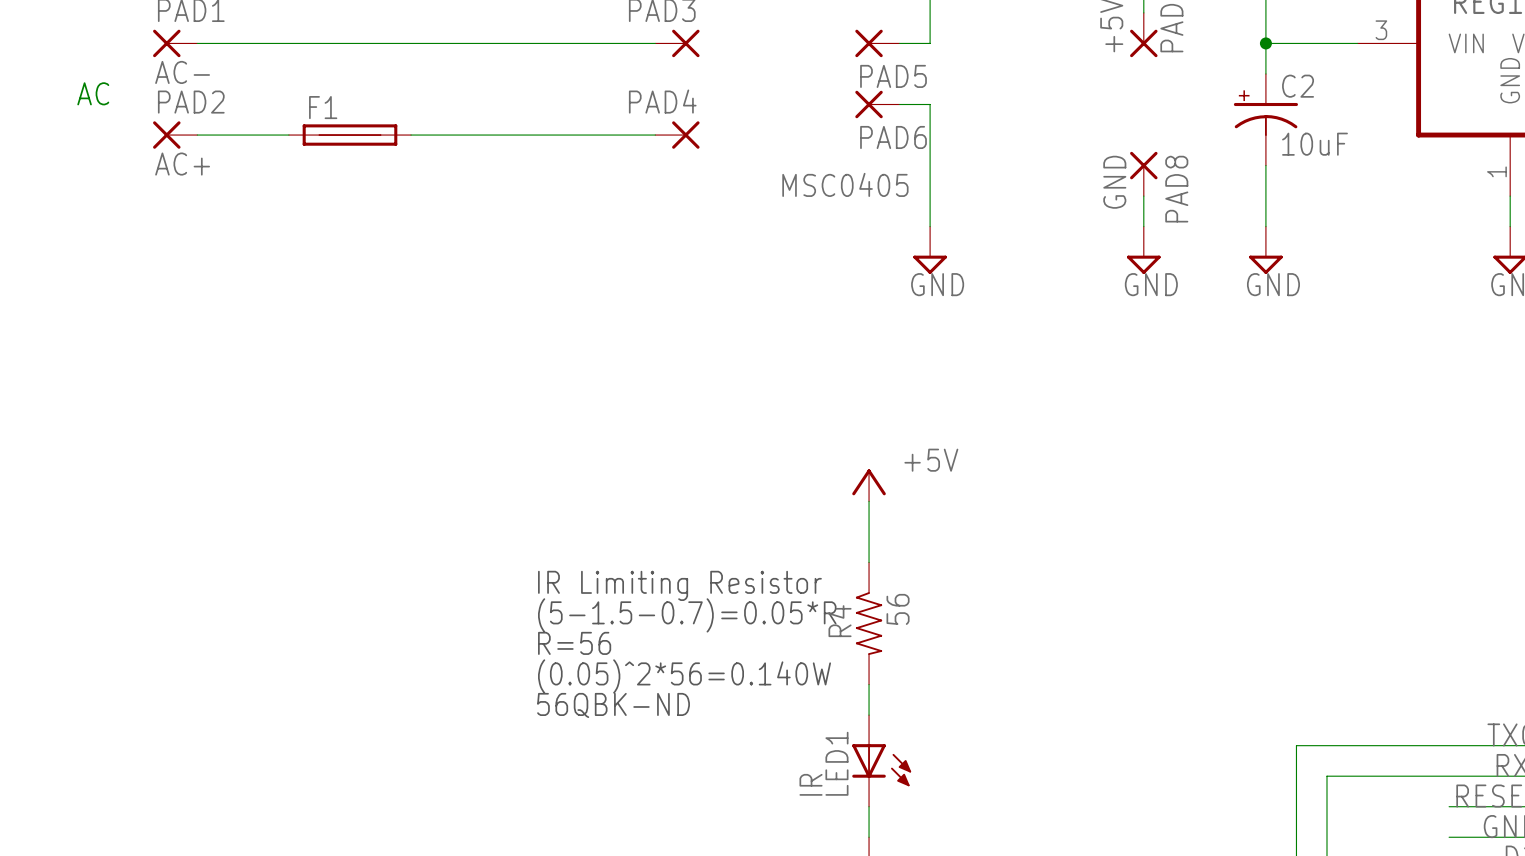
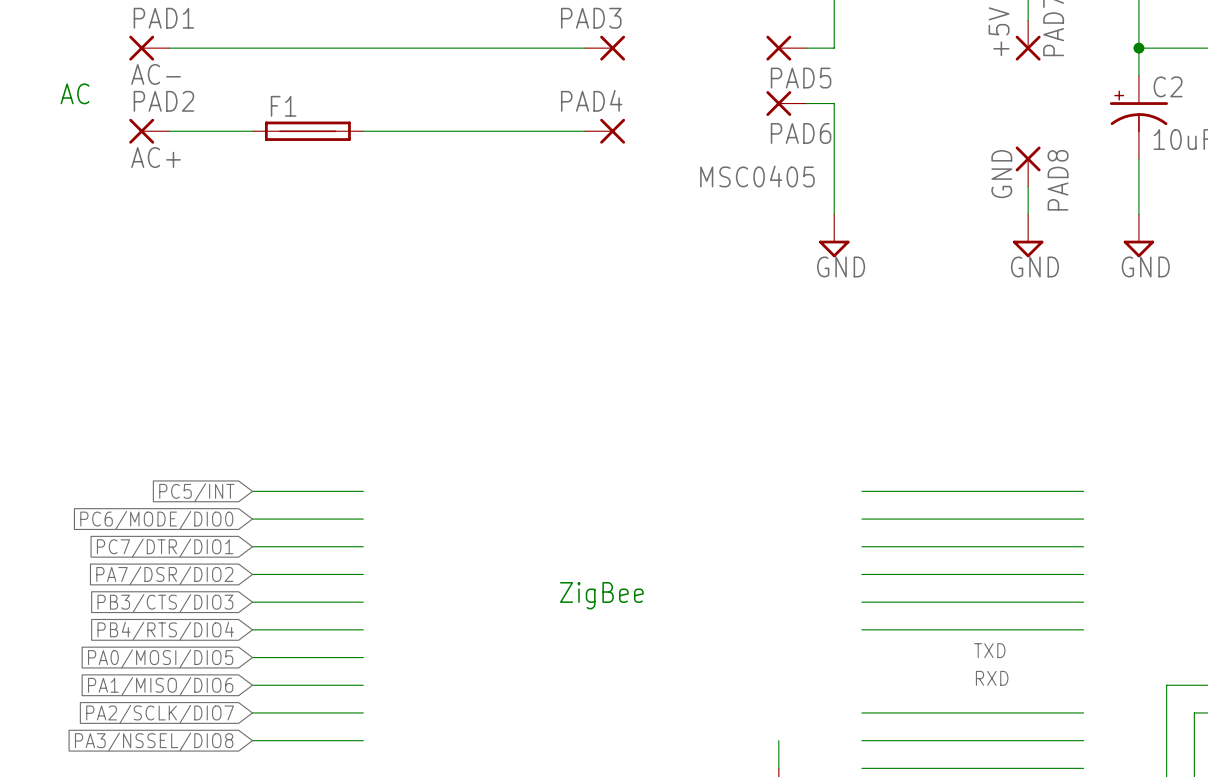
power symbol: +5V (869, 485) -> none
wire: (869, 501) (869, 562) -> none
wire: none -> (252, 491) (363, 491)
wire: none -> (861, 491) (1083, 491)
global label: none -> PC5/INT (196, 492)
wire: none -> (252, 519) (363, 519)
wire: none -> (861, 519) (1083, 519)
global label: none -> PC6/MODE/DIO0 (156, 520)
text: IR Limiting Resistor (679, 585) -> none
wire: none -> (252, 546) (363, 546)
wire: none -> (861, 546) (1083, 546)
global label: none -> PC7/DTR/DIO1 (165, 548)
text: (5-1.5-0.7)=0.05*R (687, 615) -> none
wire: none -> (252, 574) (363, 574)
R4: 56 (869, 623) -> none
wire: none -> (861, 574) (1083, 574)
global label: none -> PA7/DSR/DIO2 (164, 575)
text: R=56 (574, 643) -> none
text: none -> ZigBee (601, 595)
wire: none -> (252, 602) (363, 602)
wire: none -> (861, 602) (1083, 602)
global label: none -> PB3/CTS/DIO3 (165, 603)
text: (0.05)^2*56=0.140W (684, 676) -> none
wire: none -> (252, 629) (363, 629)
wire: (869, 684) (869, 715) -> none
wire: none -> (861, 629) (1083, 629)
global label: none -> PB4/RTS/DIO4 (165, 631)
text: 56QBK-ND (613, 705) -> none
label: none -> TXD (989, 650)
wire: none -> (252, 657) (363, 657)
global label: none -> PA0/MOSI/DIO5 (160, 658)
label: none -> RXD (992, 678)
wire: none -> (252, 685) (363, 685)
global label: none -> PA1/MISO/DIO6 (160, 686)
LED1: IR (881, 760) -> none
wire: none -> (252, 712) (363, 712)
wire: none -> (861, 712) (1083, 712)
global label: none -> PA2/SCLK/DIO7 (160, 714)
wire: none -> (252, 740) (363, 740)
wire: none -> (861, 740) (1083, 740)
global label: none -> PA3/NSSEL/DIO8 (154, 741)
wire: none -> (861, 768) (1083, 768)

